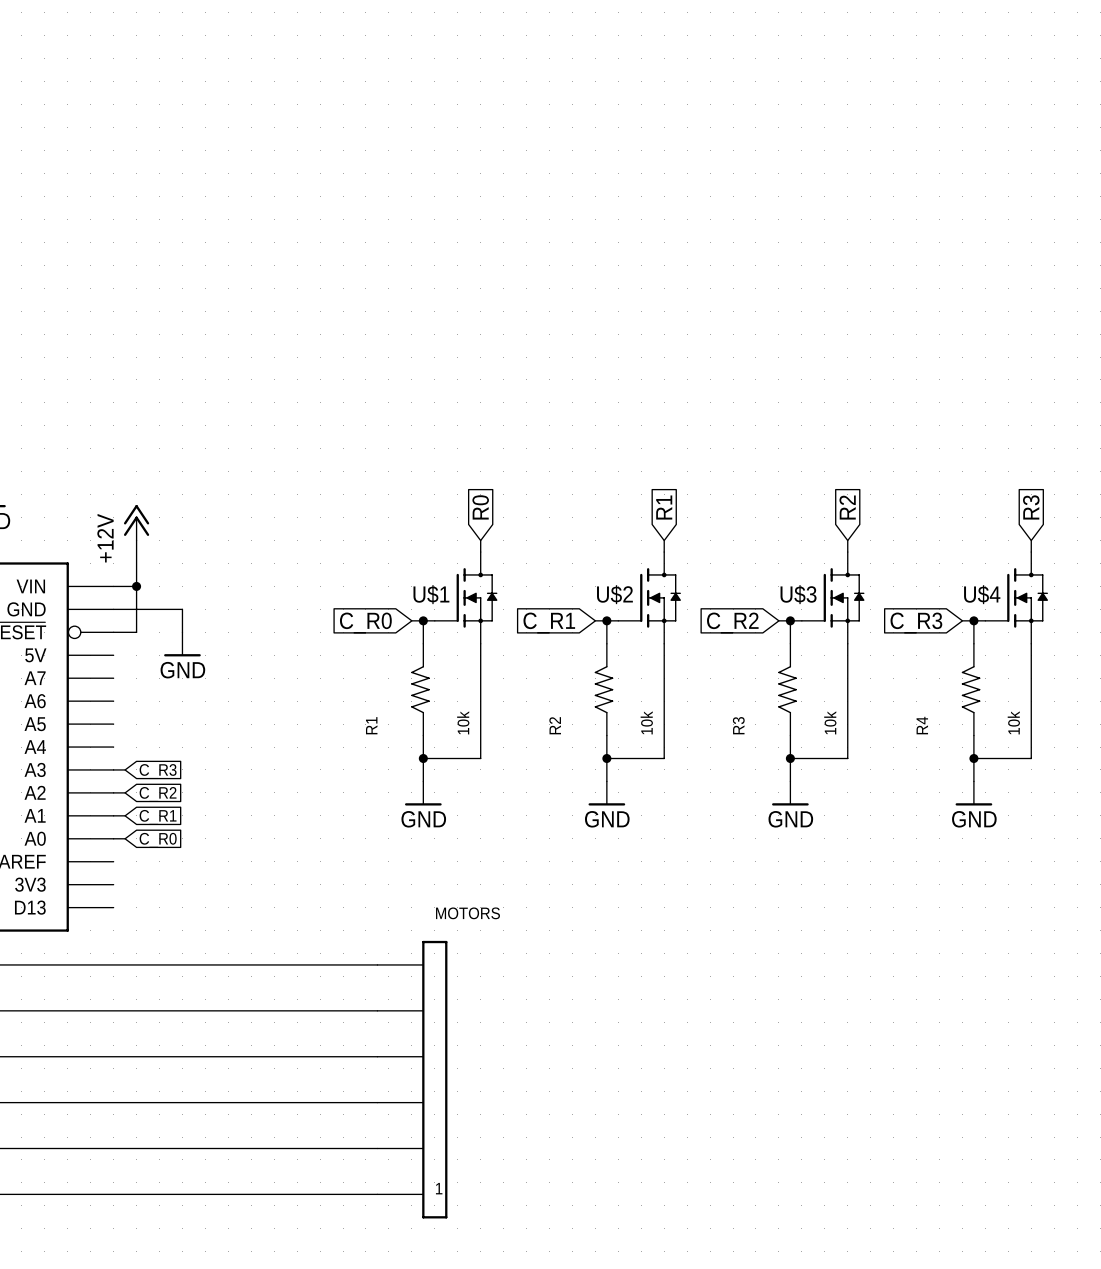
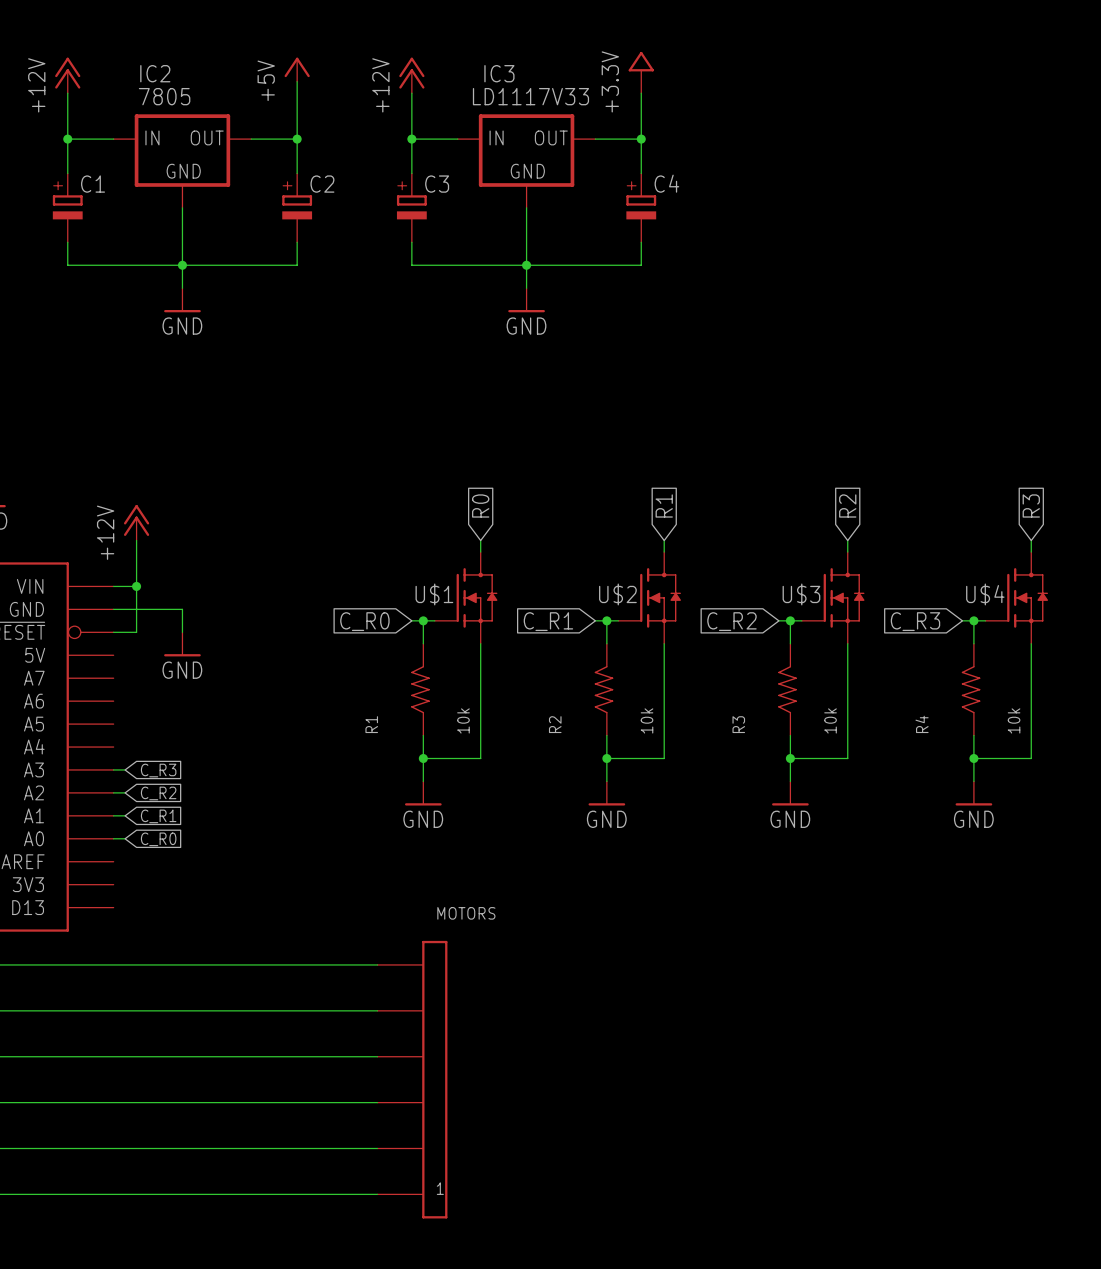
power symbol: none -> +5V (297, 69)
power symbol: none -> +3.3V (641, 72)
power symbol: none -> +12V (67, 75)
power symbol: none -> +12V (411, 75)
wire: none -> (297, 81) (297, 173)
wire: none -> (67, 93) (67, 173)
wire: none -> (411, 93) (411, 173)
wire: none -> (641, 93) (641, 173)
wire: none -> (67, 139) (113, 139)
junction: none -> (67, 139)
wire: none -> (251, 139) (297, 139)
junction: none -> (297, 139)
wire: none -> (411, 139) (457, 139)
junction: none -> (411, 139)
wire: none -> (595, 139) (641, 139)
junction: none -> (641, 139)
IC2: none -> 7805 (182, 161)
IC3: none -> LD1117V33 (526, 161)
C1: none -> (67, 207)
wire: none -> (182, 207) (182, 288)
C2: none -> (297, 207)
C3: none -> (411, 207)
wire: none -> (526, 207) (526, 288)
C4: none -> (641, 207)
wire: none -> (67, 242) (67, 265) (297, 265) (297, 242)
wire: none -> (411, 242) (411, 265) (641, 265) (641, 242)
junction: none -> (182, 265)
junction: none -> (526, 265)
power symbol: none -> GND (182, 300)
power symbol: none -> GND (526, 300)

